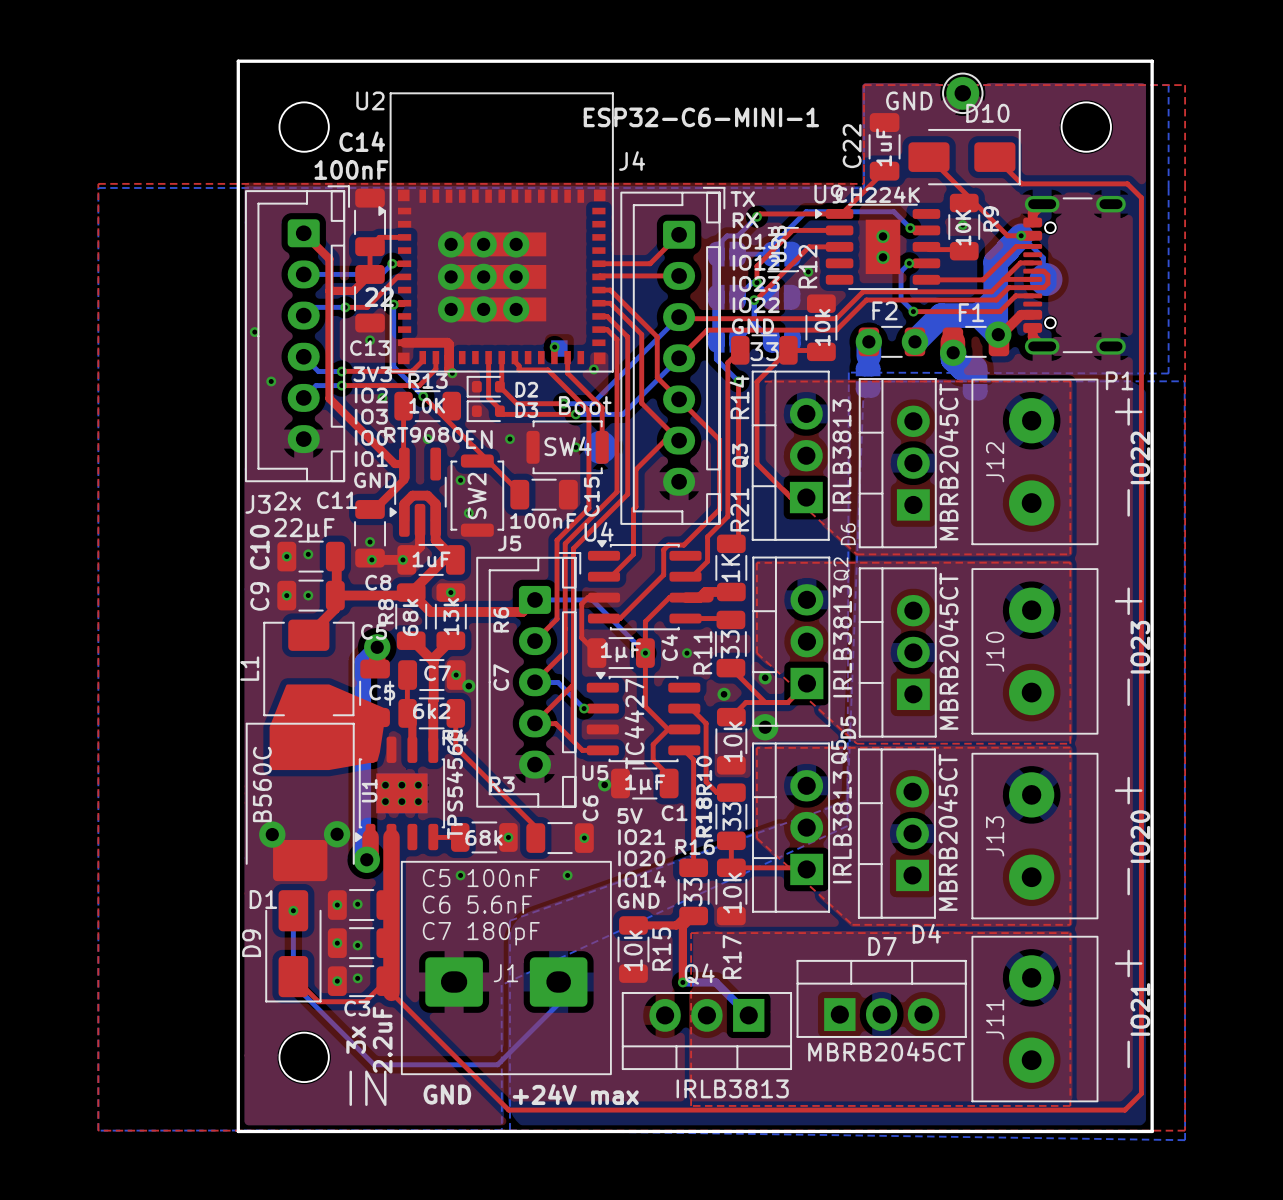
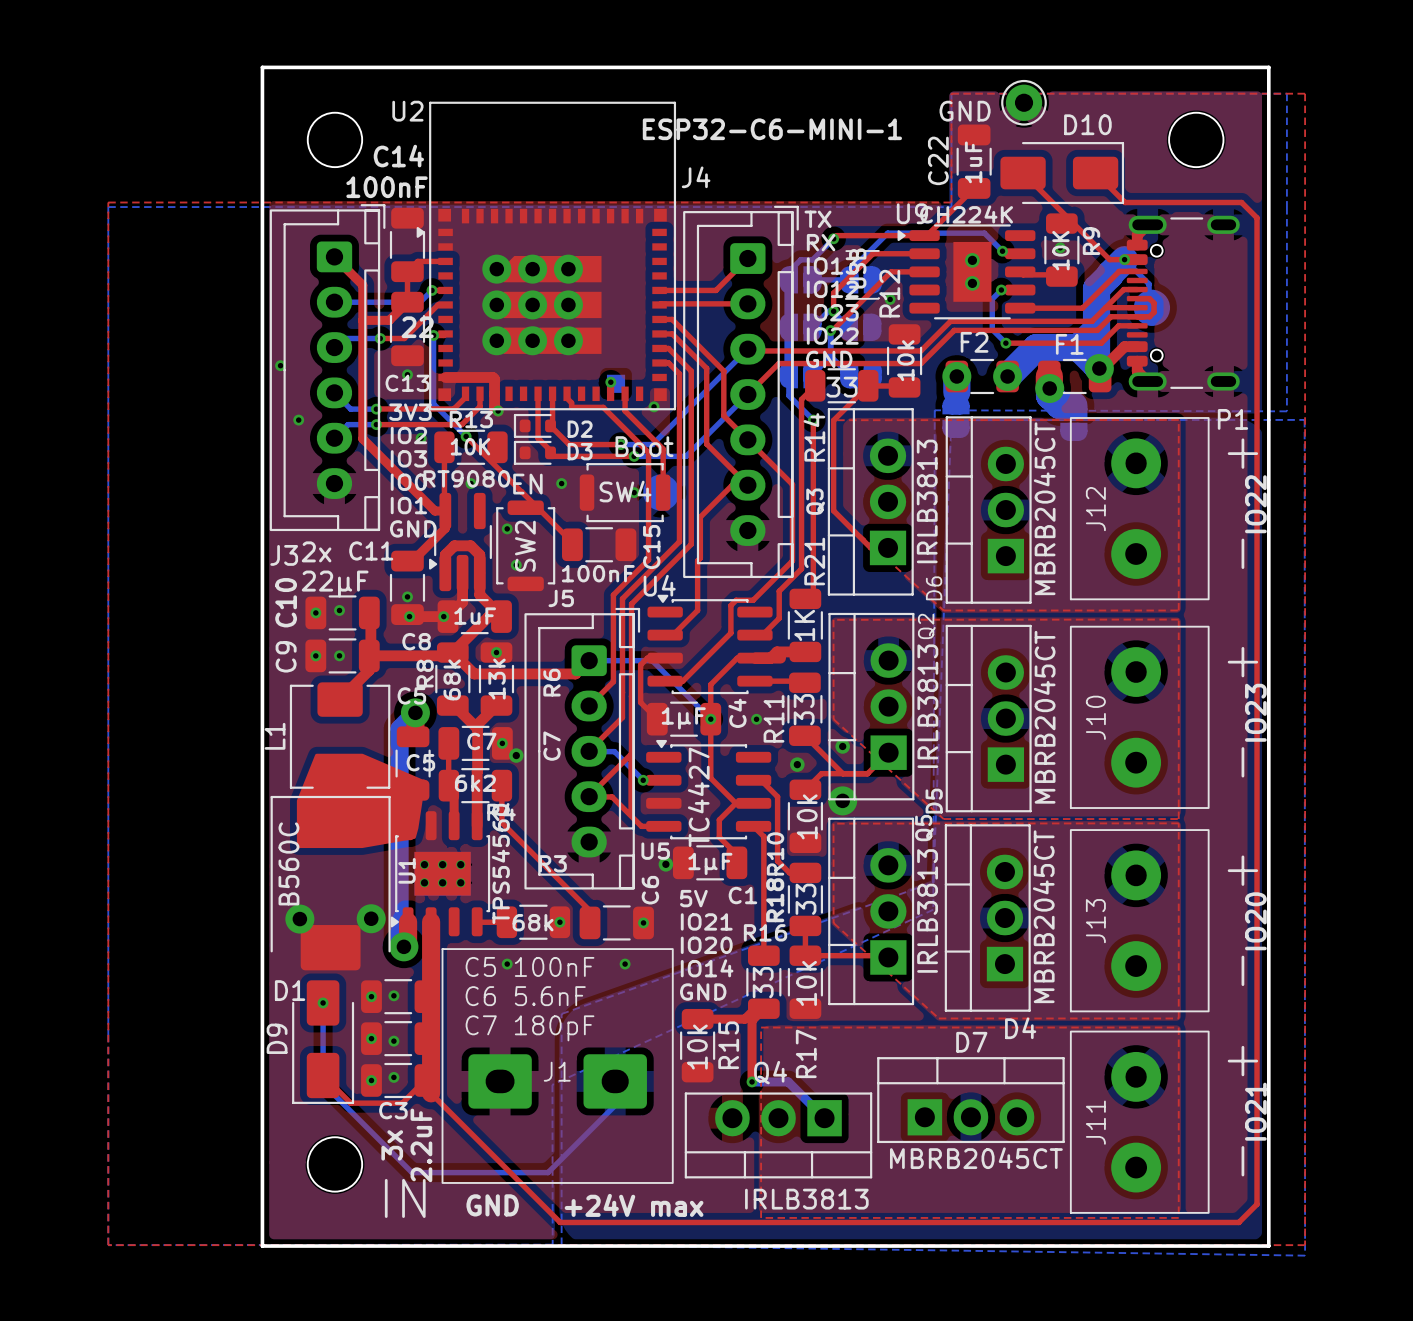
part position: (962, 93) -> (1024, 102)

